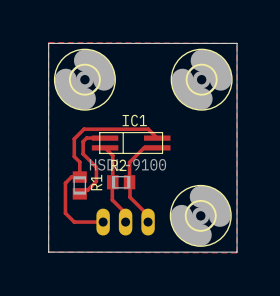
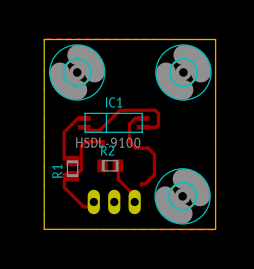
track: none -> (84, 118) (78, 118) (64, 132) (64, 159)
track: none -> (143, 118) (135, 118) (129, 123) (129, 141) (135, 148) (148, 148) (154, 154) (154, 174) (145, 183) (141, 185)
IC1 footprint: [91, 132, 171, 154] -> [77, 112, 150, 133]
track: (104, 138) (86, 138) (83, 141) (83, 153) (96, 167) (96, 181) (87, 190) (79, 193) -> none
track: (157, 138) (148, 129) (84, 129) (74, 138) (74, 156) (79, 162) (79, 177) (71, 177) (65, 183) (65, 213) (74, 222) (103, 222) -> none
track: none -> (84, 127) (87, 130) (99, 130) (119, 110) (155, 110) (158, 113) (158, 124) (155, 127) (143, 127)
track: (105, 147) (112, 155) (112, 199) (125, 213) (125, 222) -> none
track: (157, 147) (144, 147) (129, 162) (129, 182) (125, 186) -> none
track: none -> (102, 144) (103, 141) (86, 141) (81, 146) (81, 169) (76, 174) (64, 174) (64, 187) (83, 206) (93, 206)
R1 name position: R1 (96, 182) -> R1 (57, 171)

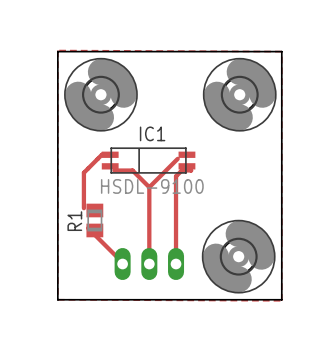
track: (143, 118) (135, 118) (129, 123) (129, 141) (135, 148) (148, 148) (154, 154) (154, 174) (145, 183) (141, 185) -> none
track: none -> (177, 158) (149, 187)
track: (84, 127) (87, 130) (99, 130) (119, 110) (155, 110) (158, 113) (158, 124) (155, 127) (143, 127) -> none
track: none -> (114, 170) (132, 170) (149, 187)
track: none -> (149, 187) (149, 270)
track: (102, 144) (103, 141) (86, 141) (81, 146) (81, 169) (76, 174) (64, 174) (64, 187) (83, 206) (93, 206) -> (88, 228) (122, 262) (122, 270)
R2: (110, 165) -> none
track: (117, 165) (118, 179) (134, 195) -> (191, 170) (181, 170) (176, 176) (176, 256)

